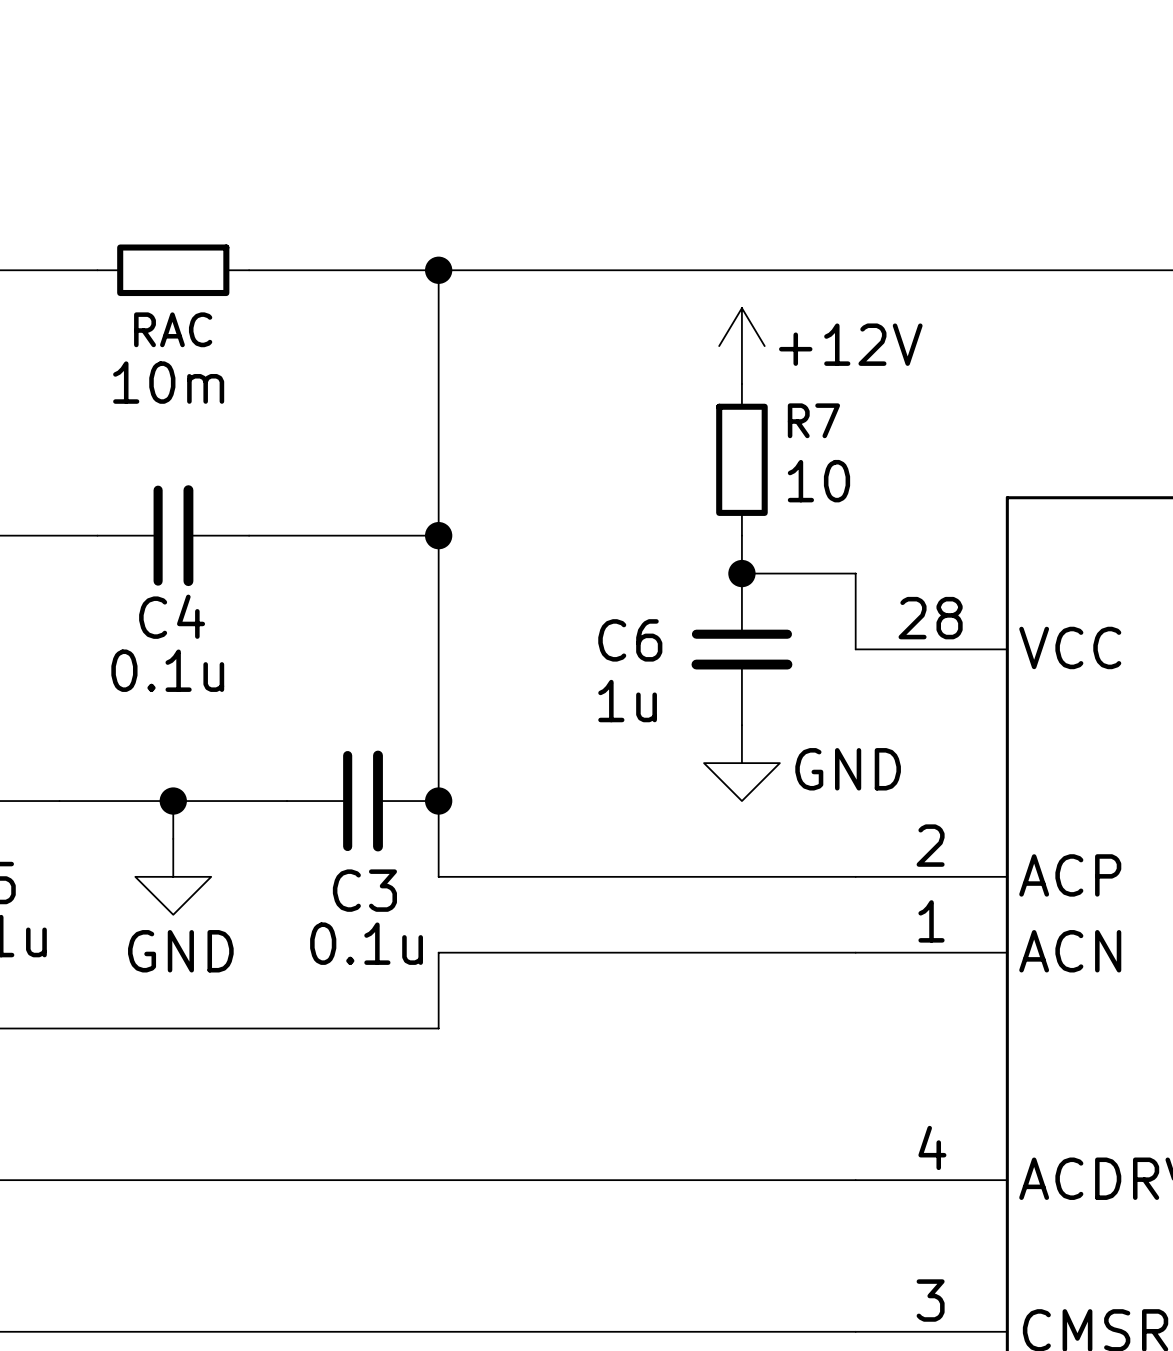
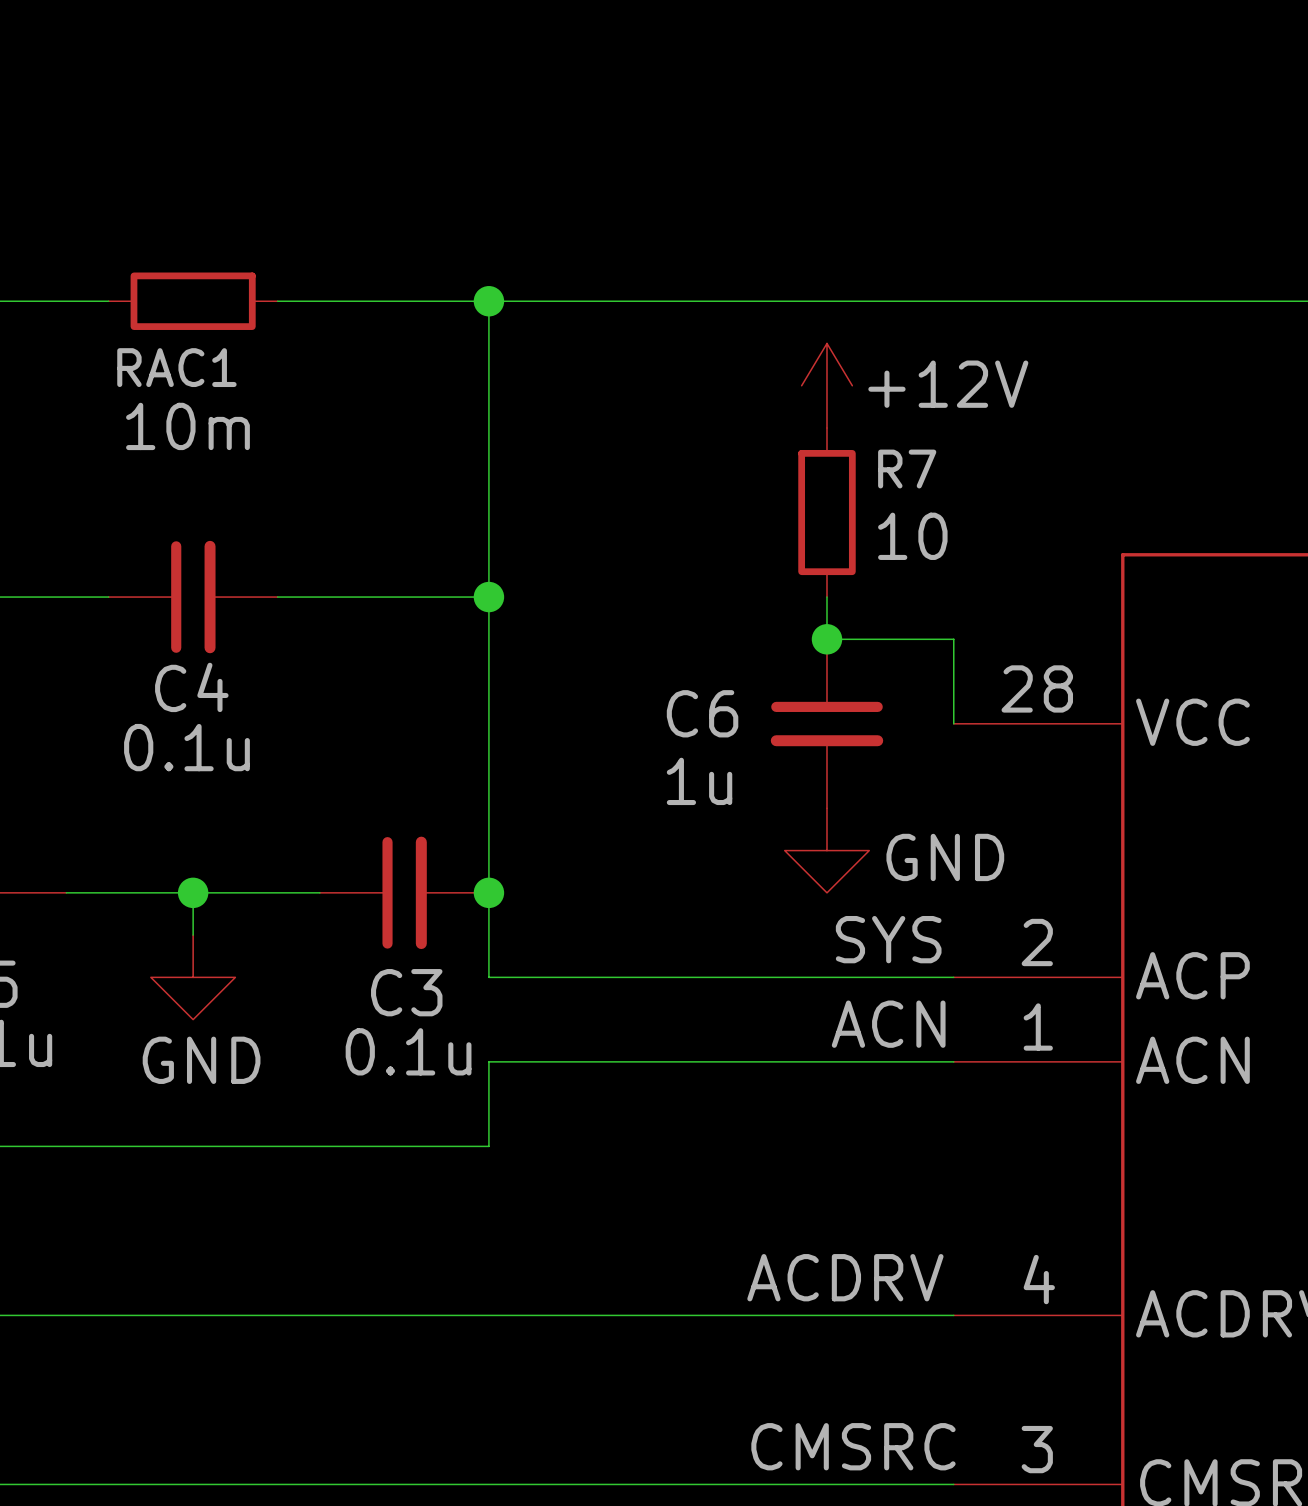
RAC name: RAC (173, 329) -> RAC1 (176, 367)
label: none -> SYS (888, 939)
label: none -> ACN (888, 1024)
label: none -> ACDRV (845, 1277)
label: none -> CMSRC (853, 1446)

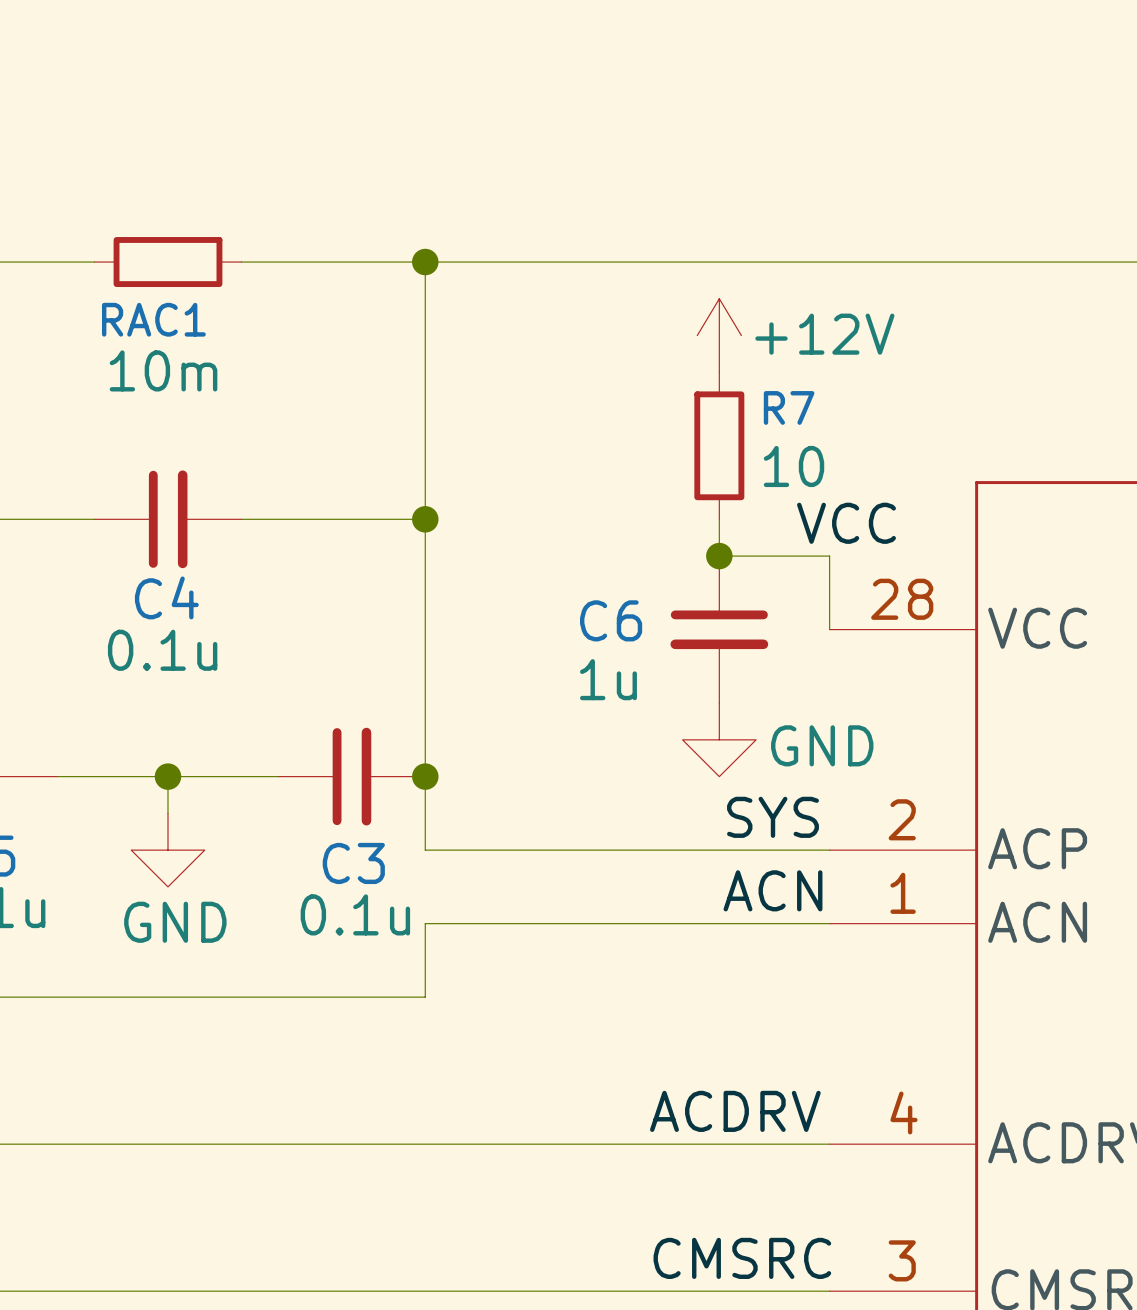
label: none -> VCC (846, 523)

